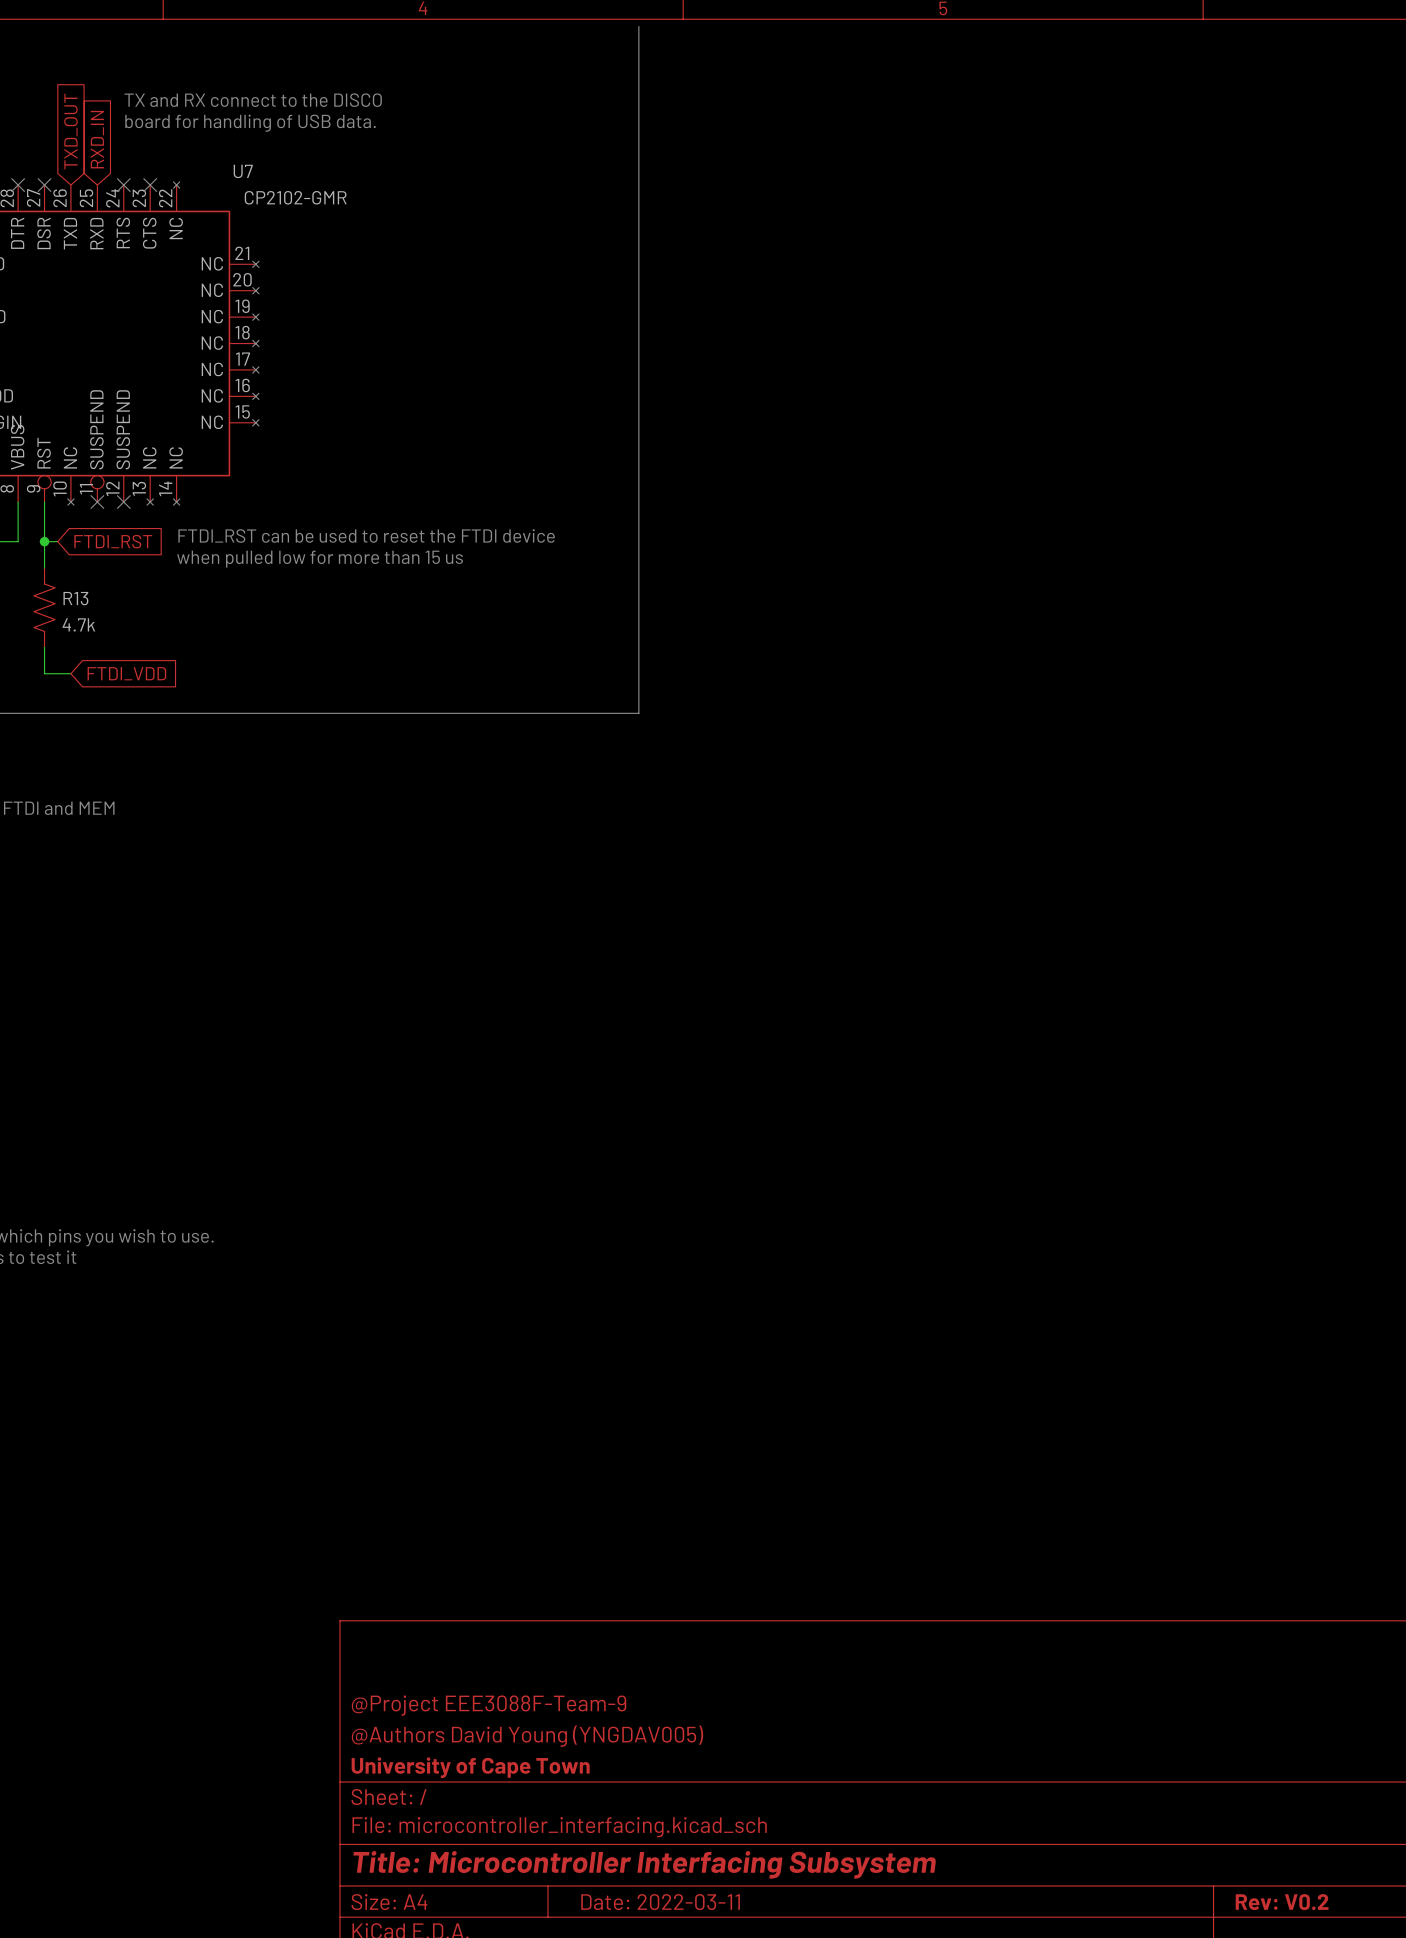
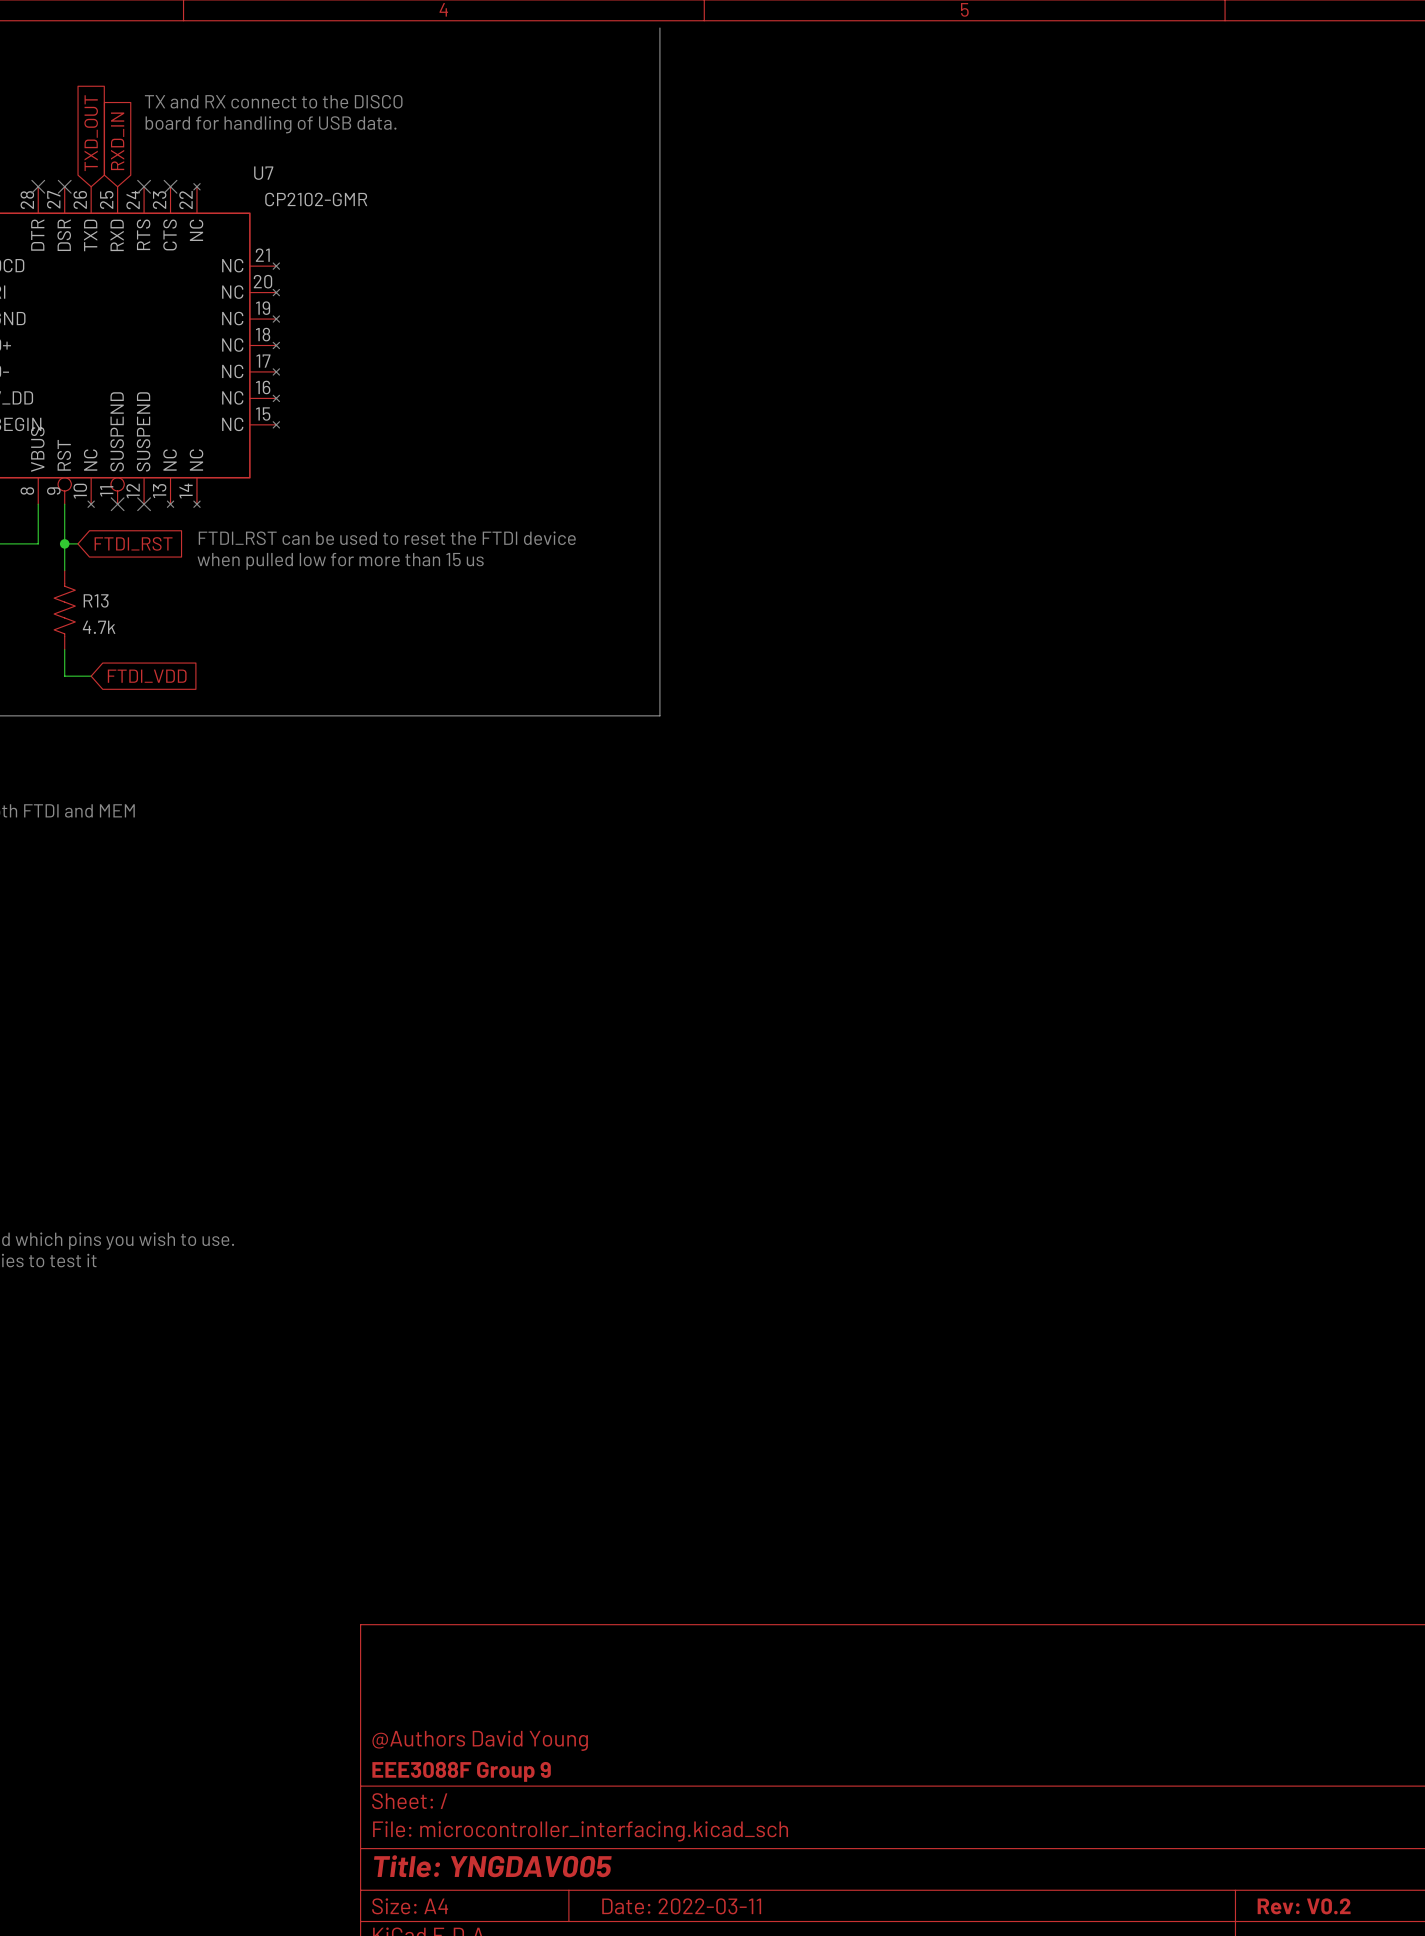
title block: @Project EEE3088F-Team-9 (489, 1705) -> none
title block: @Authors David Young (YNGDAV005) (527, 1736) -> @Authors David Young (480, 1740)
title block: University of Cape Town (470, 1767) -> EEE3088F Group 9 (461, 1771)
title block: Title: Microcontroller Interfacing Subsystem (644, 1864) -> Title: YNGDAV005 (492, 1866)

